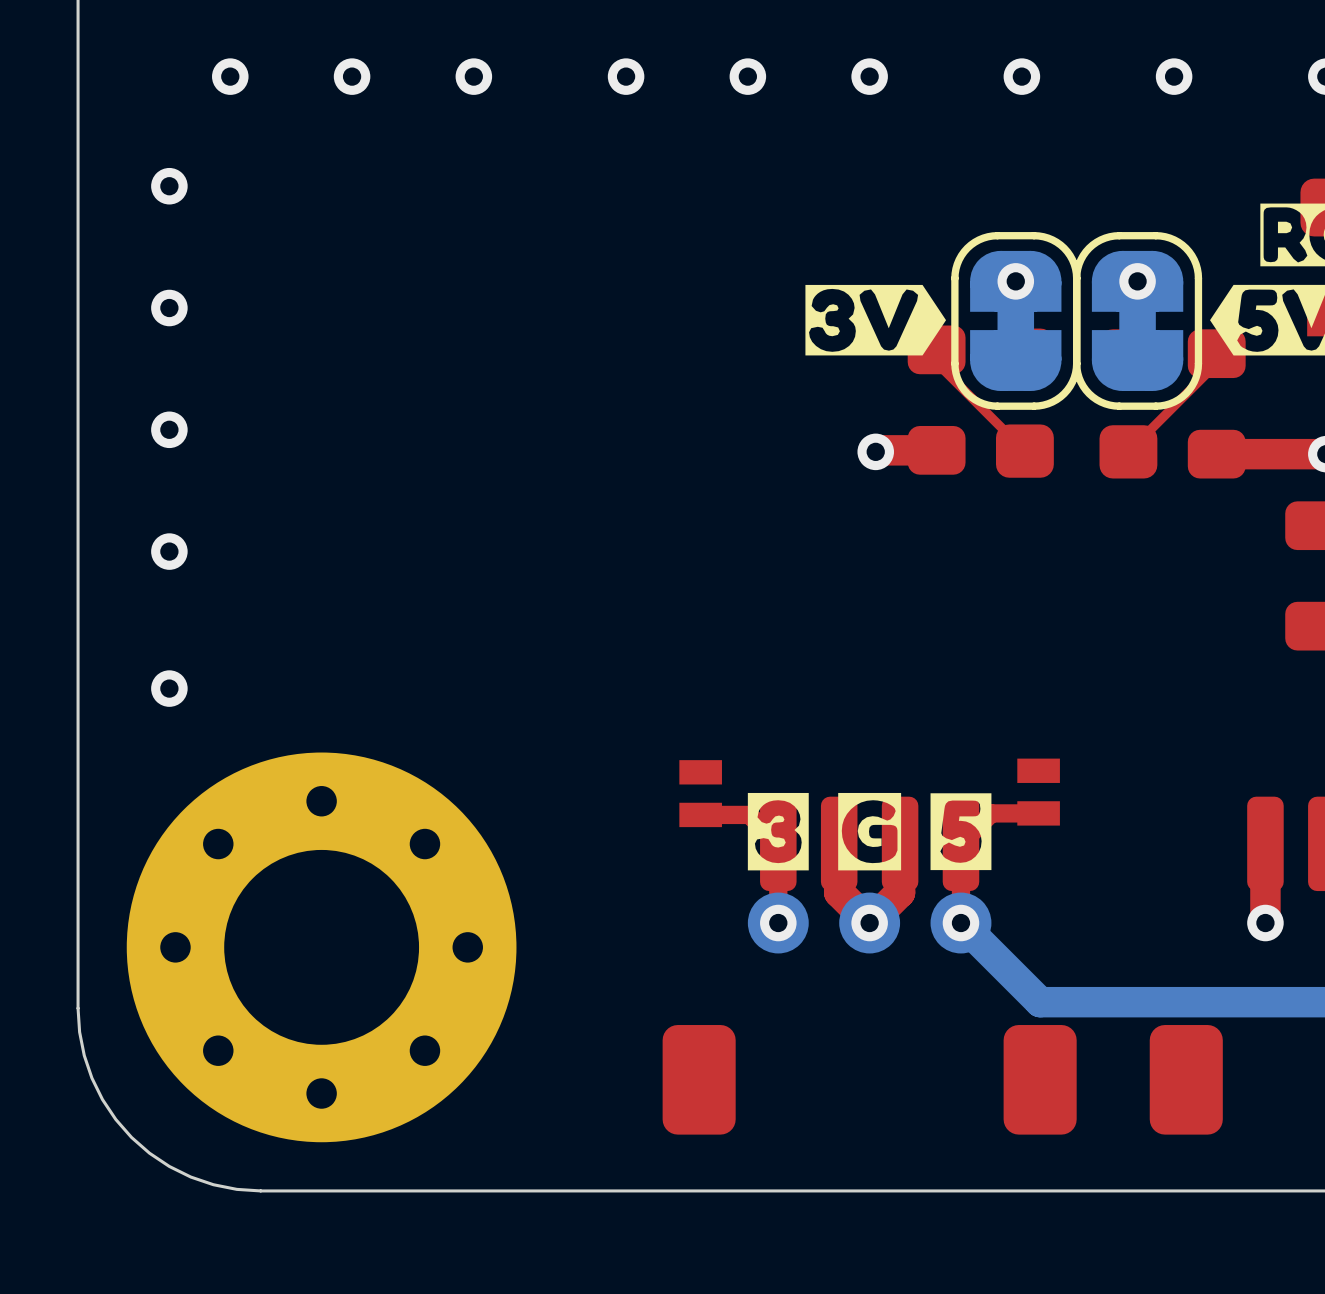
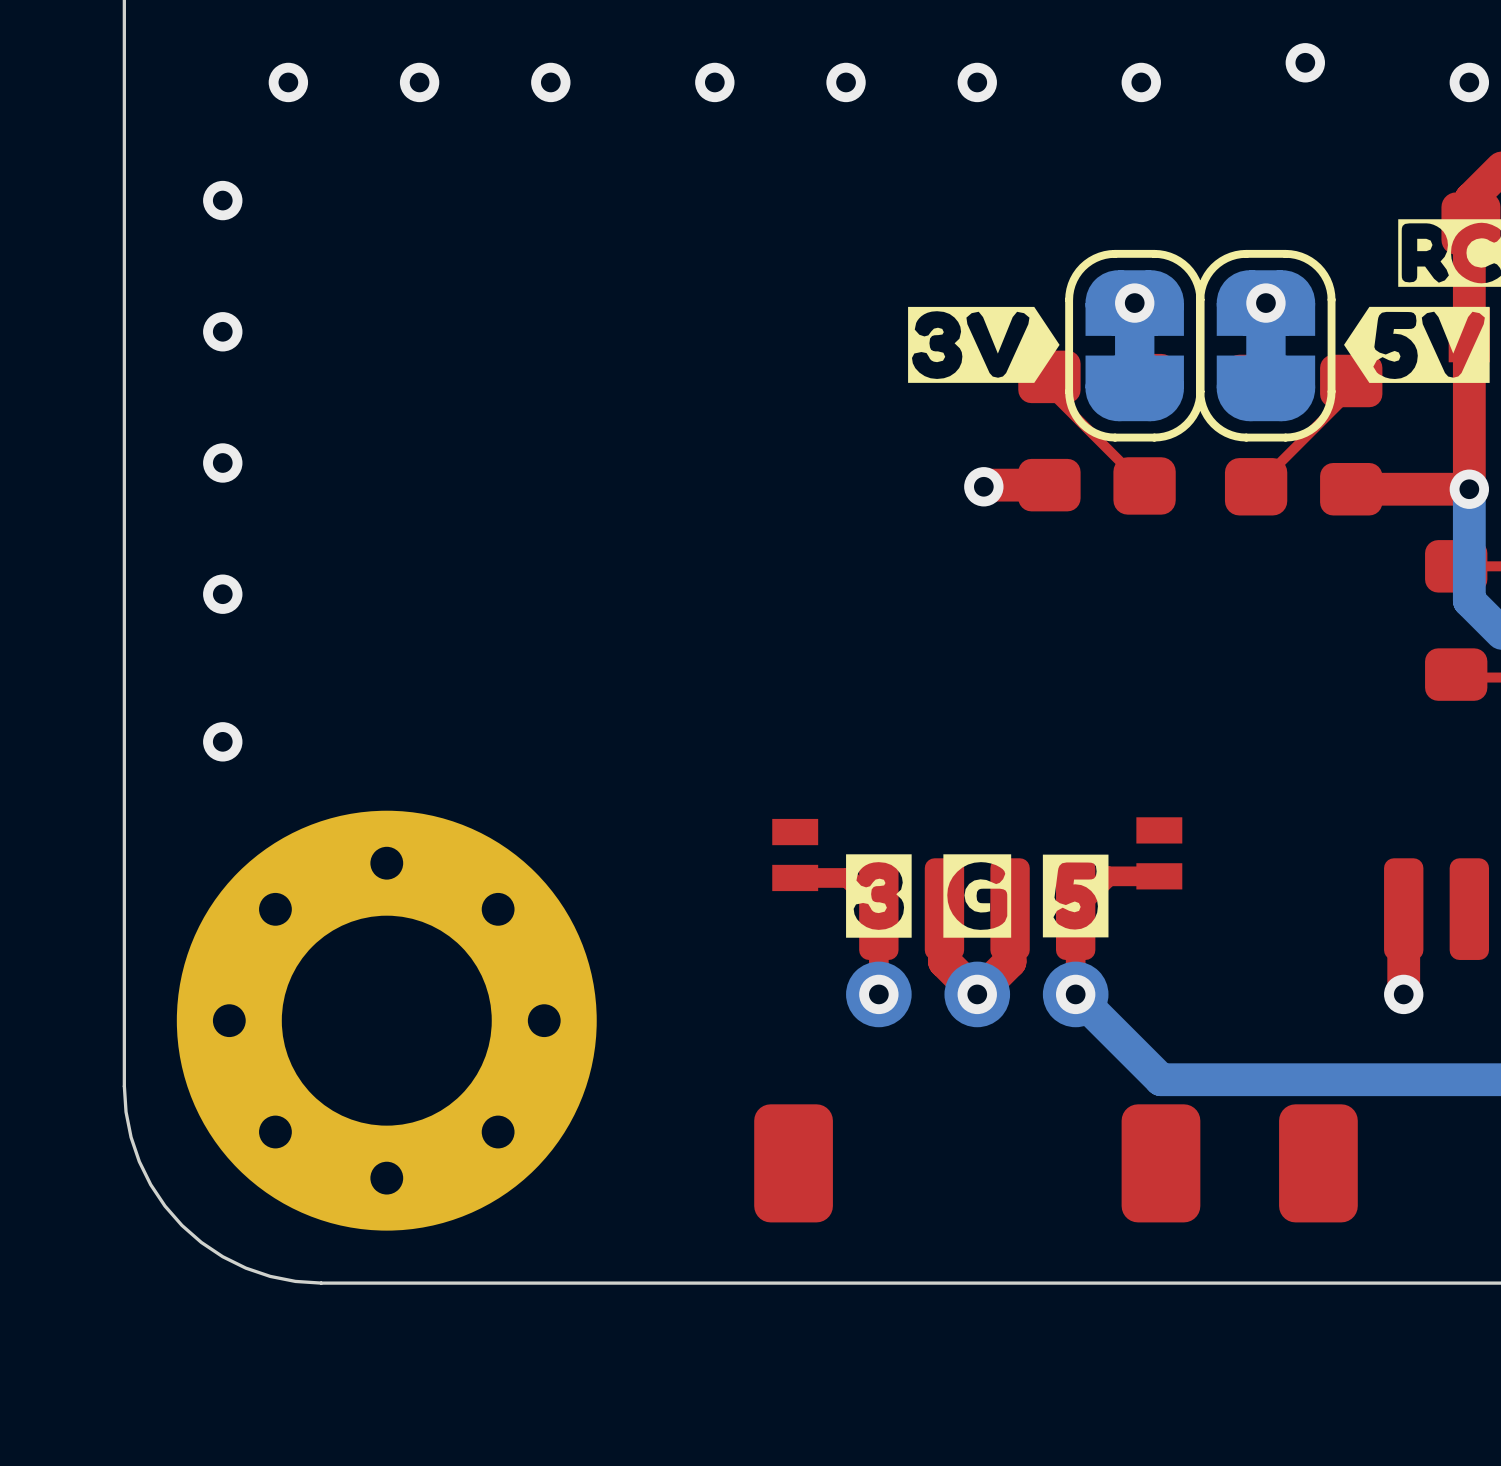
via position: (1174, 76) -> (1305, 62)

